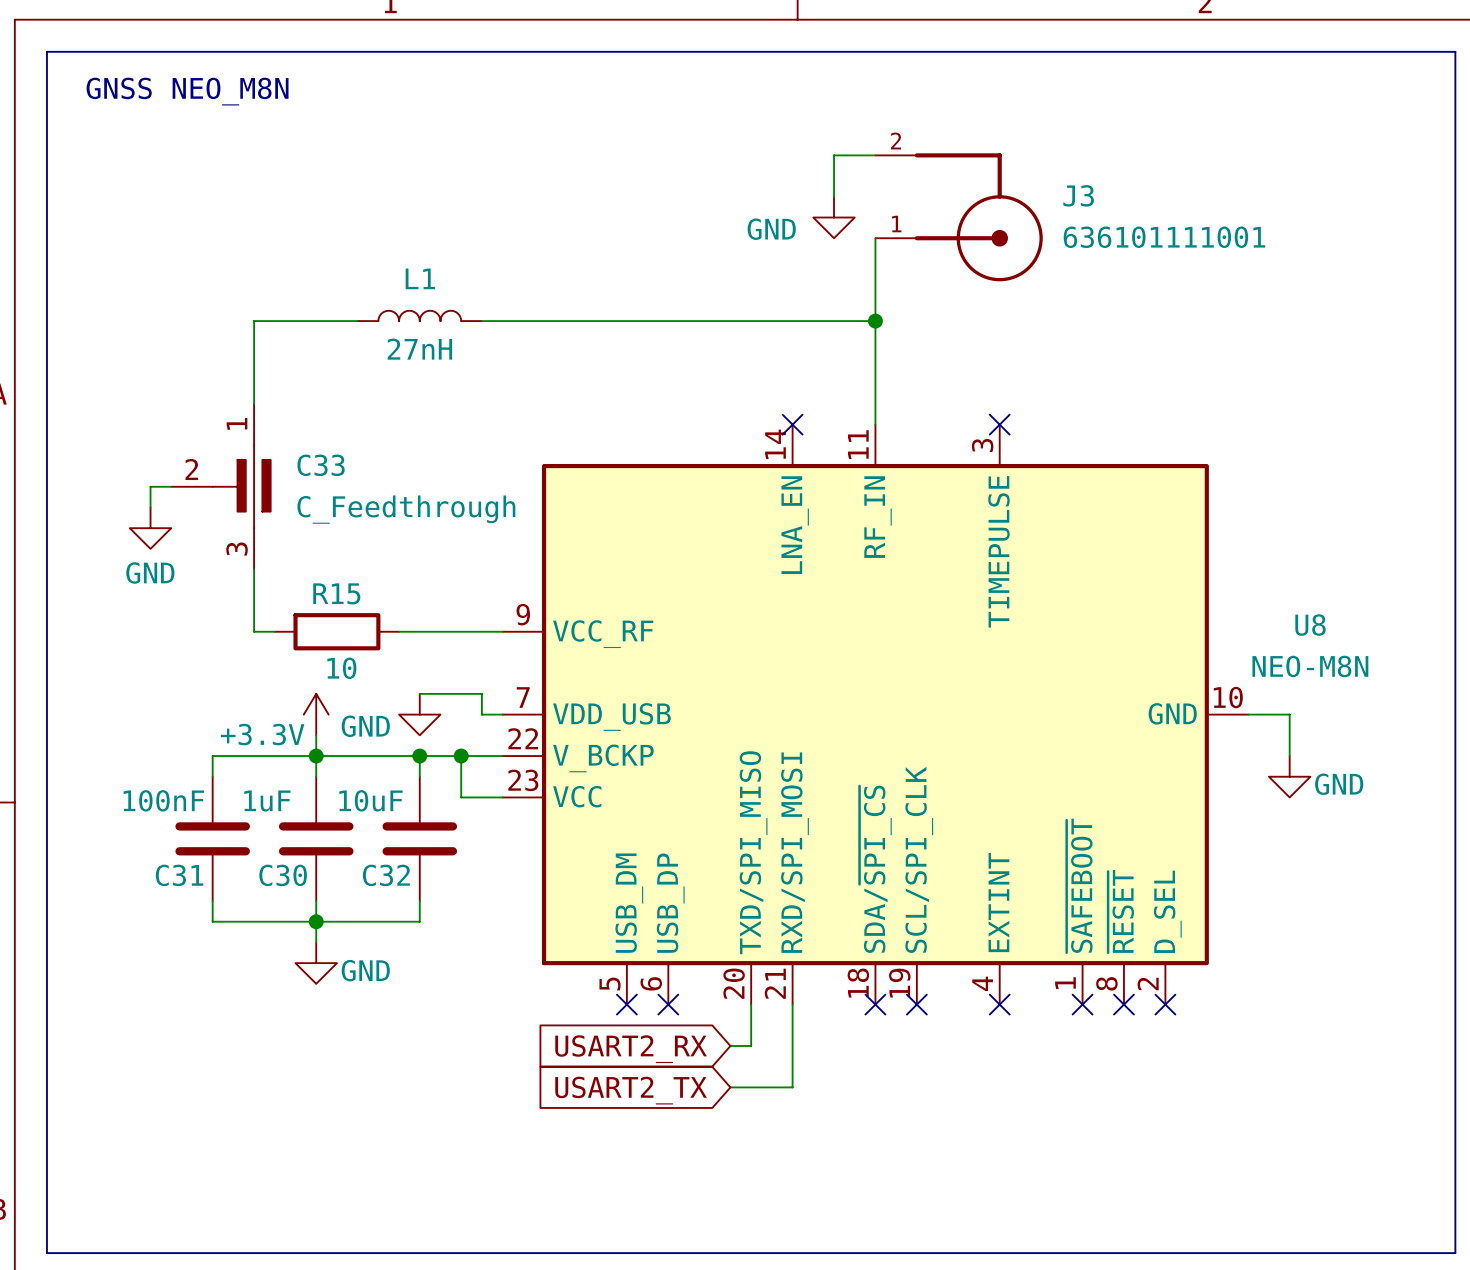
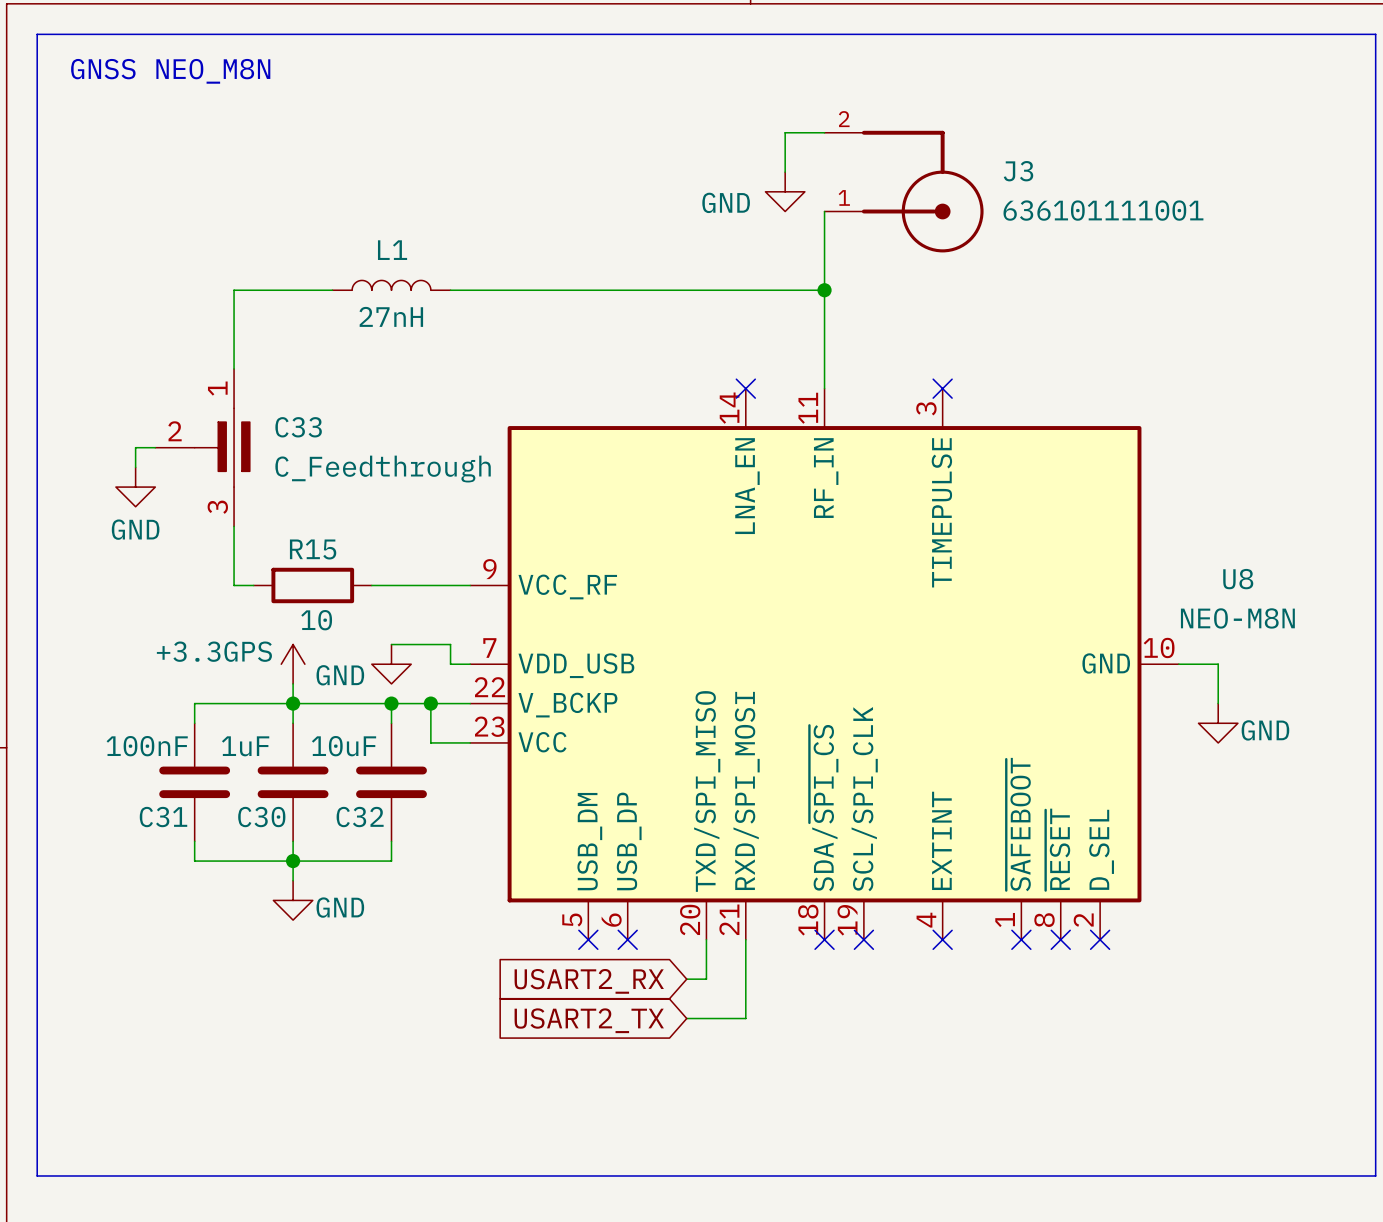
power symbol: +3.3V (316, 714) -> +3.3GPS (293, 664)

